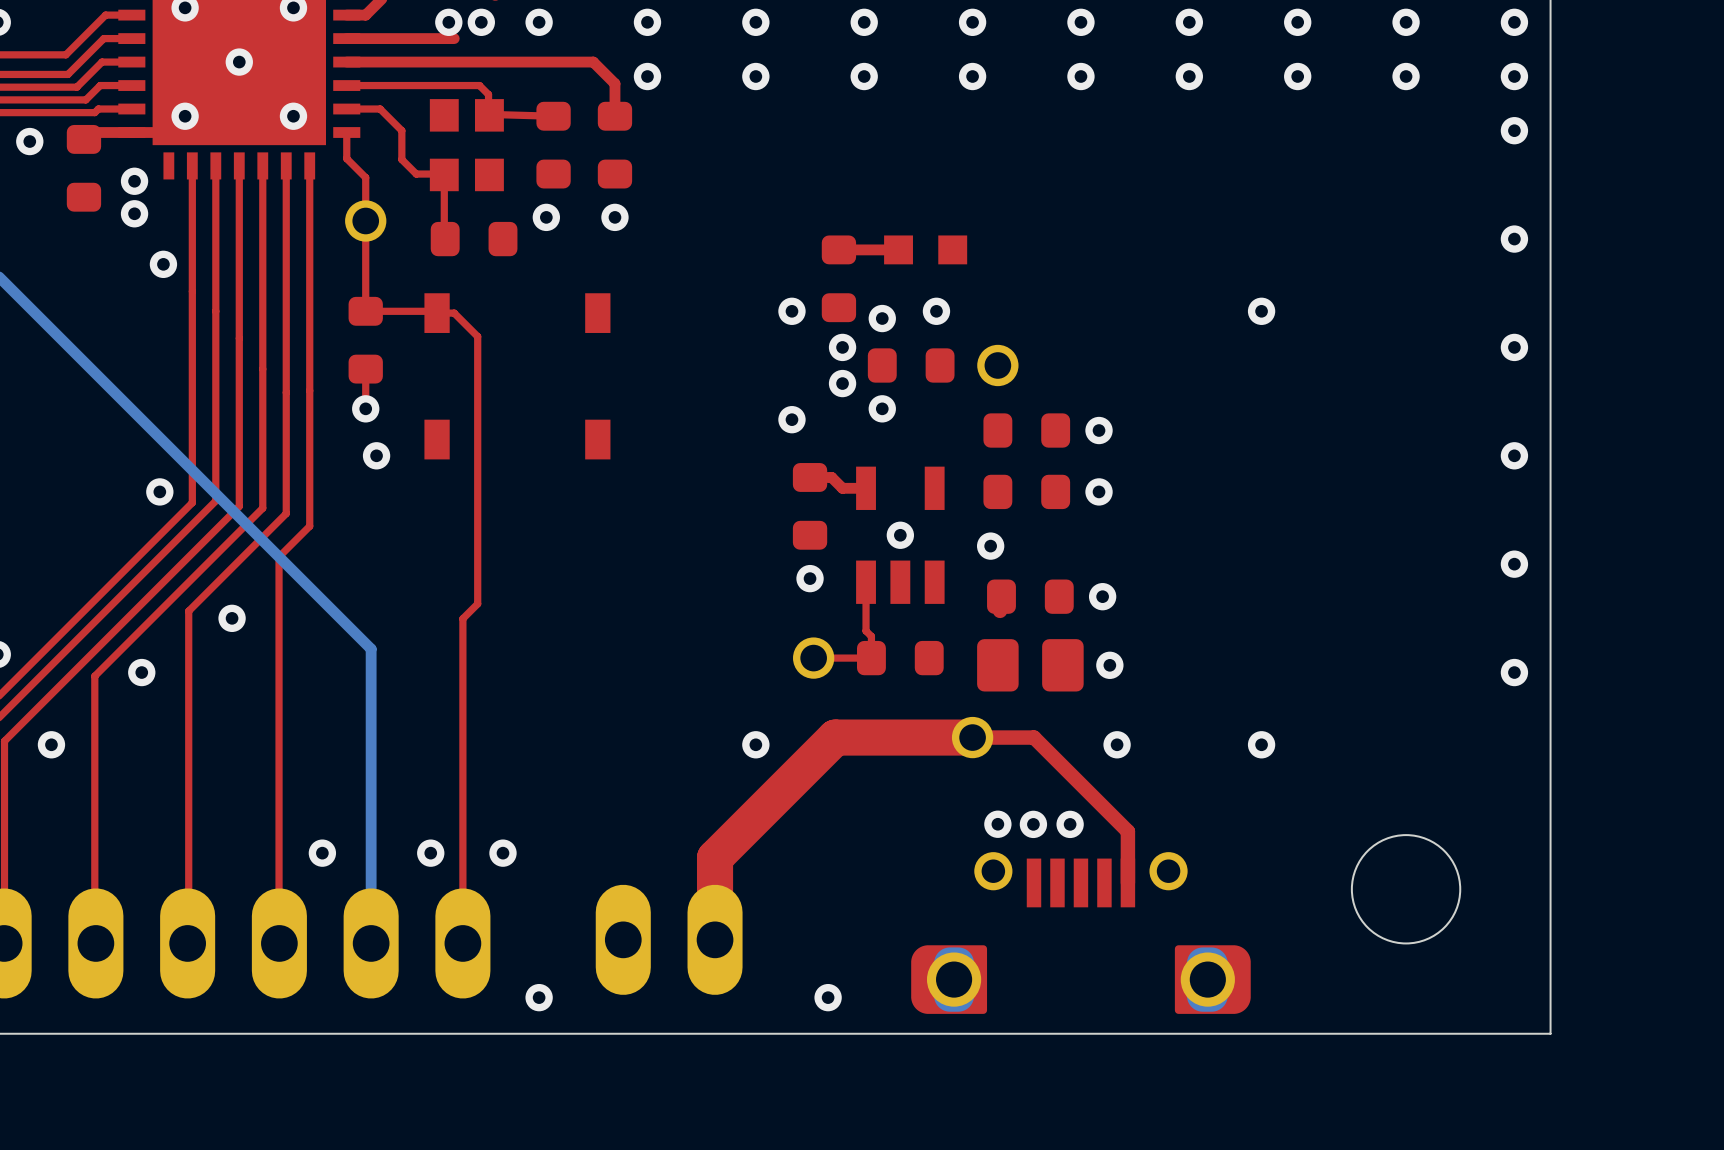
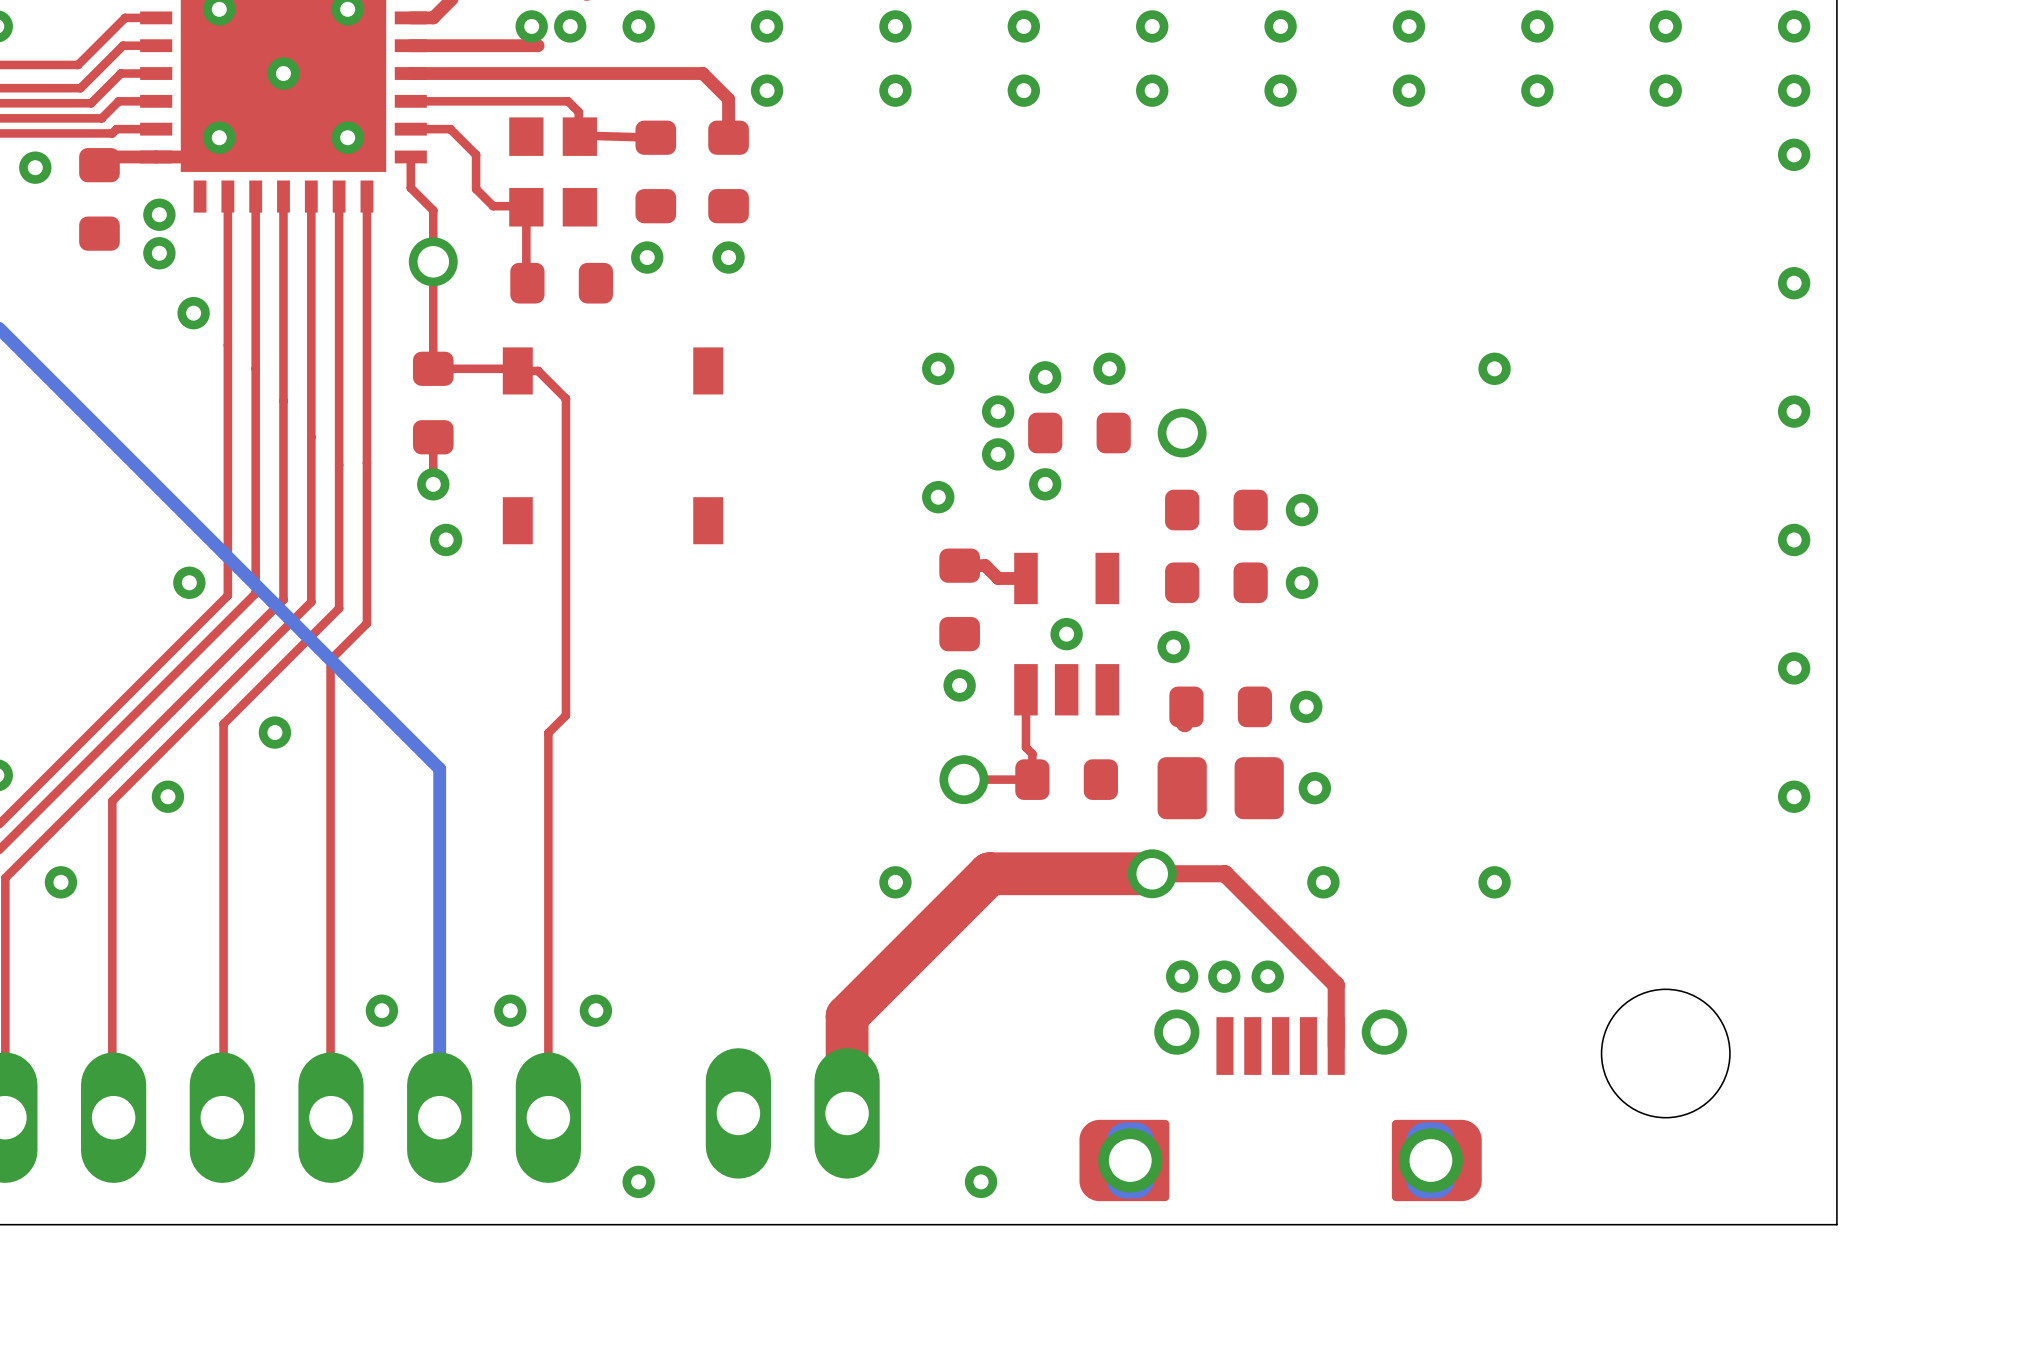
top track: (898, 249) (838, 249) -> none
part: (925, 249) -> none
part: (838, 278) -> none

